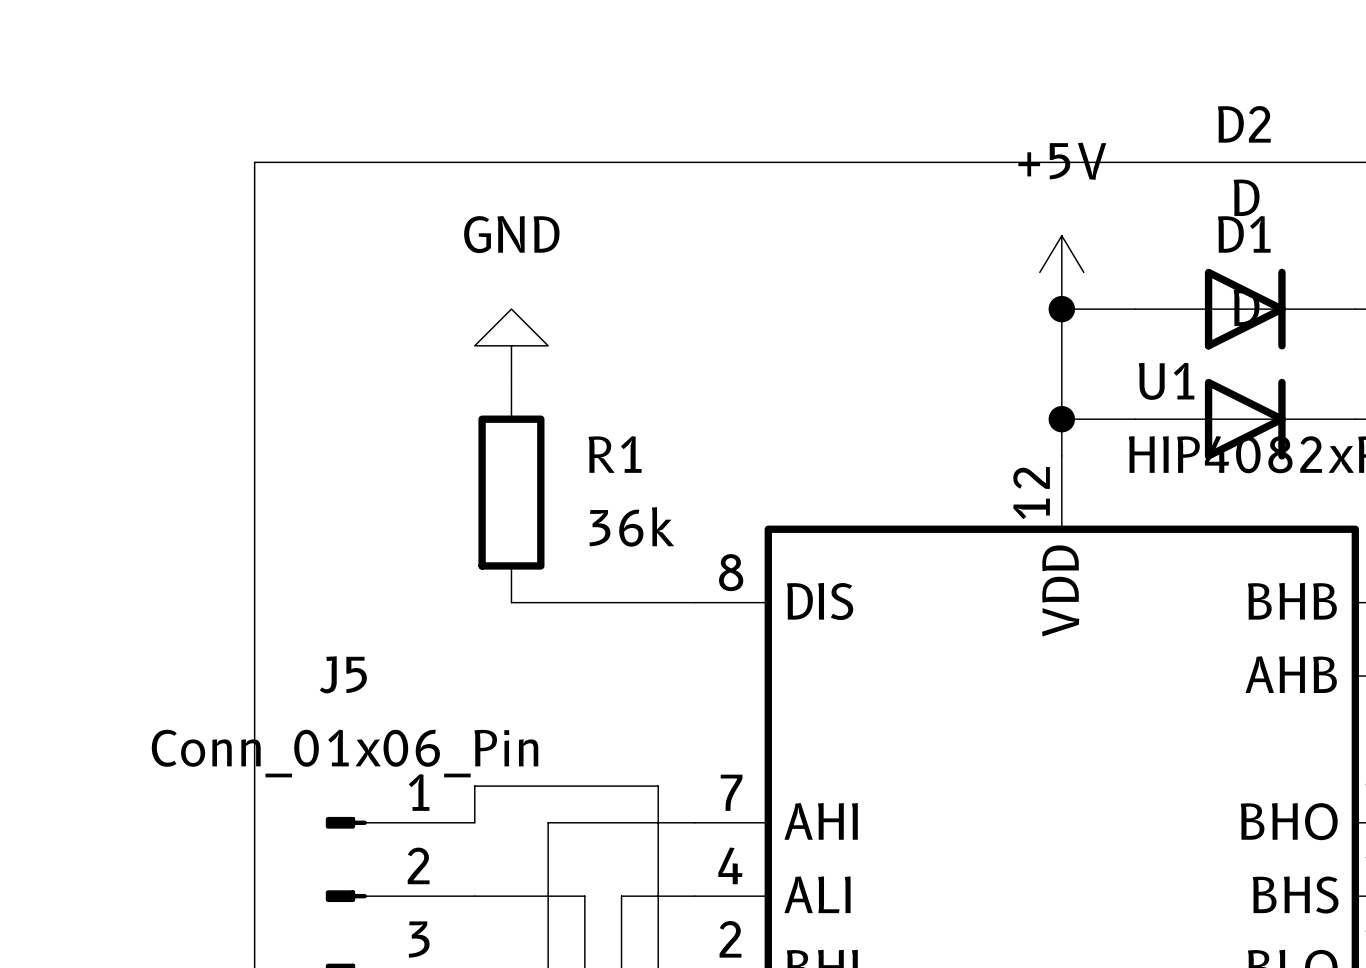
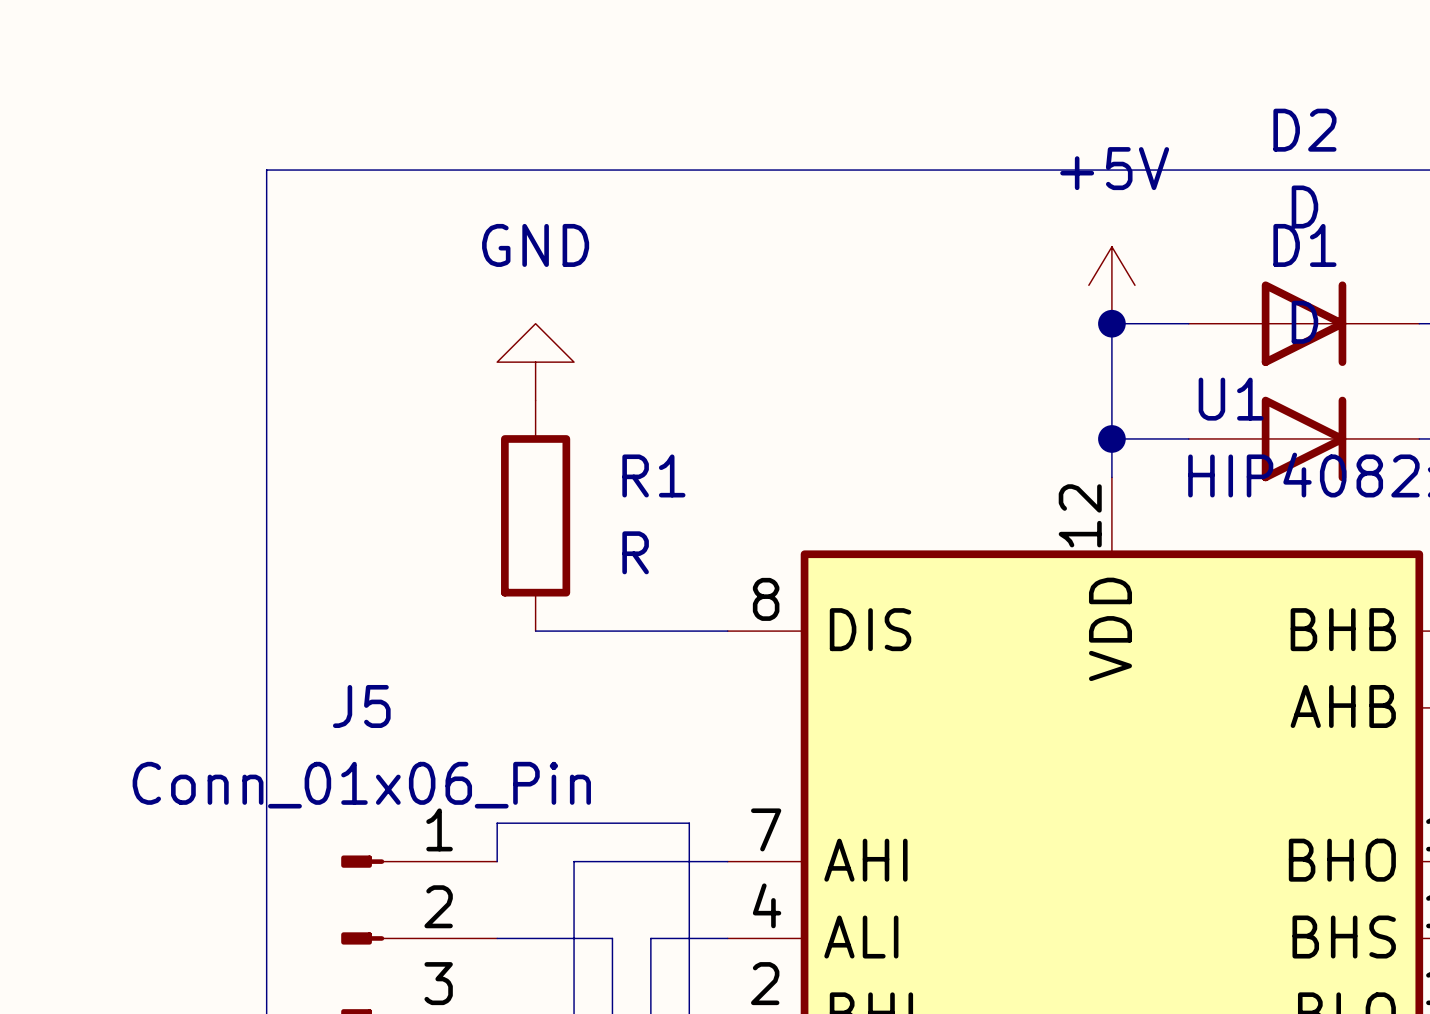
R1 value: 36k (631, 526) -> R (635, 552)

